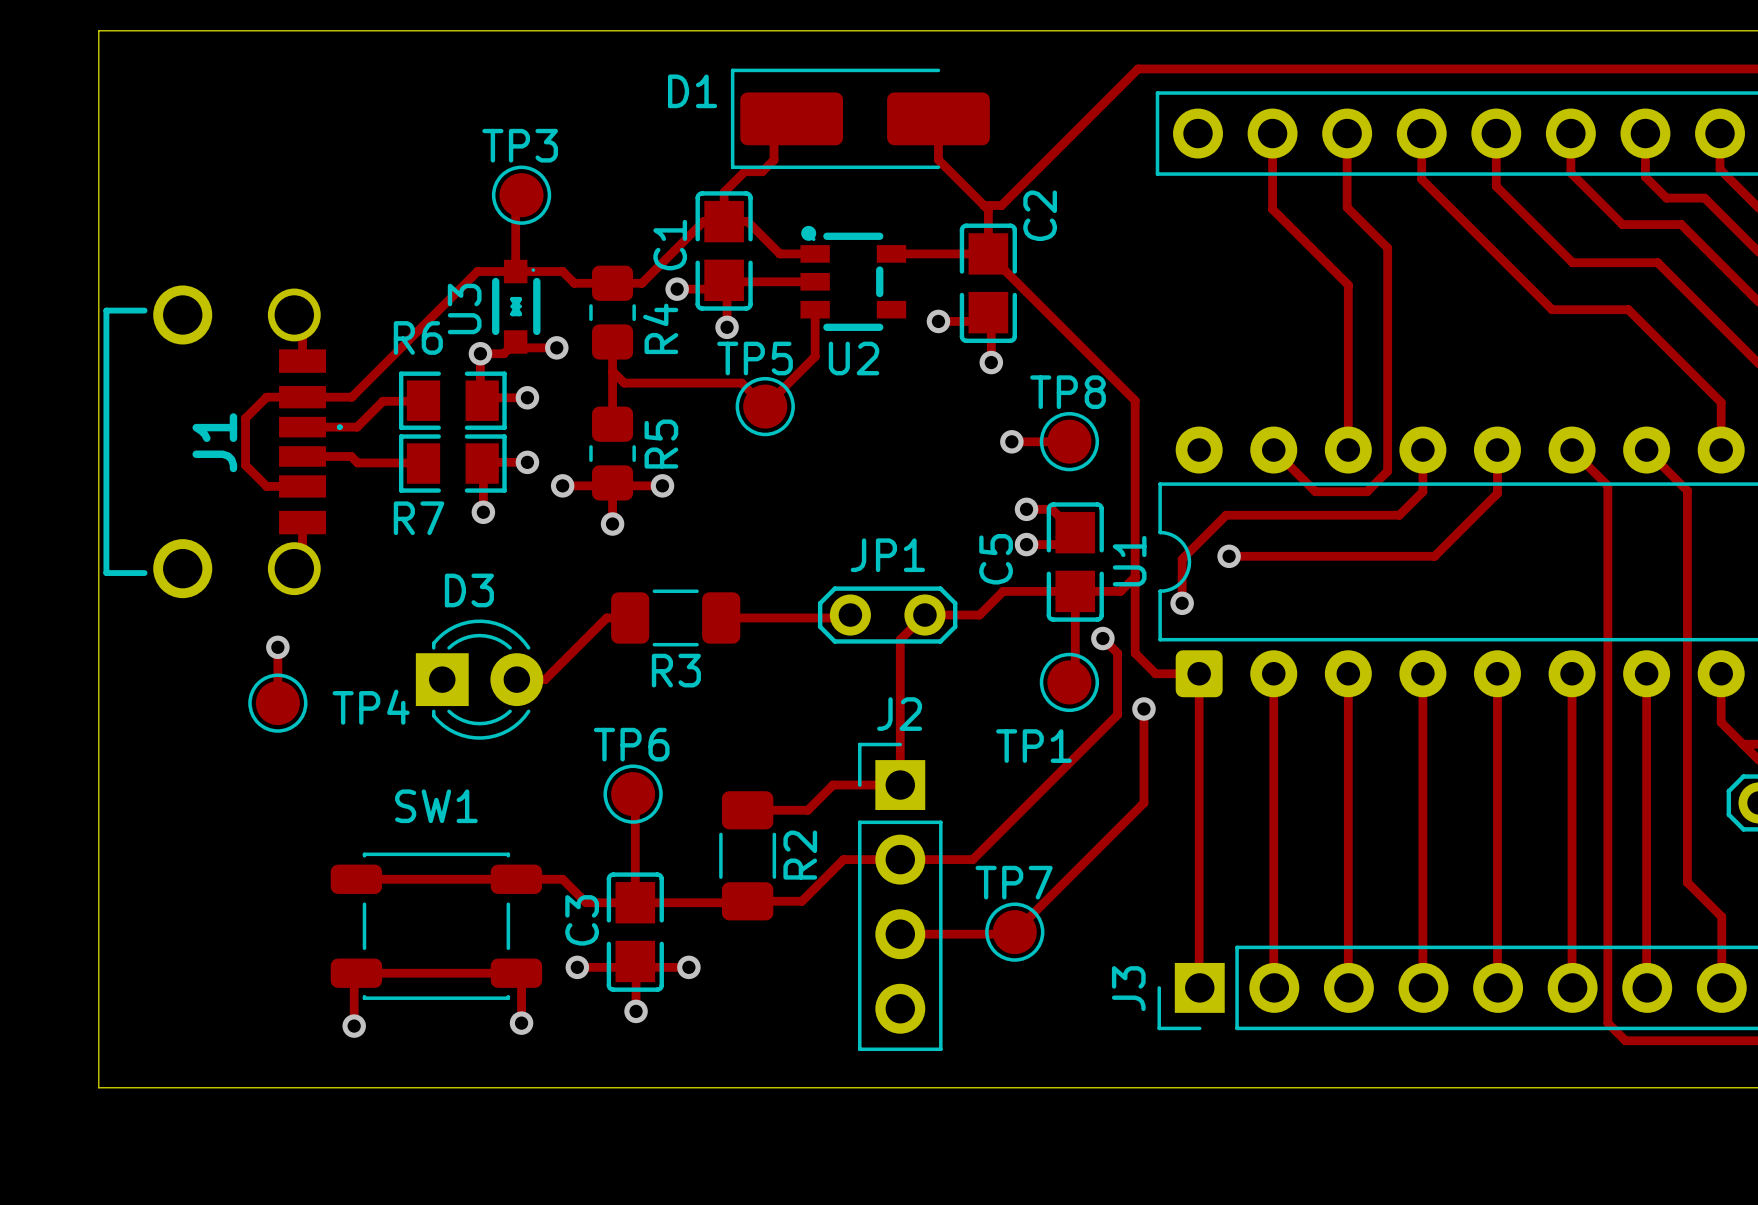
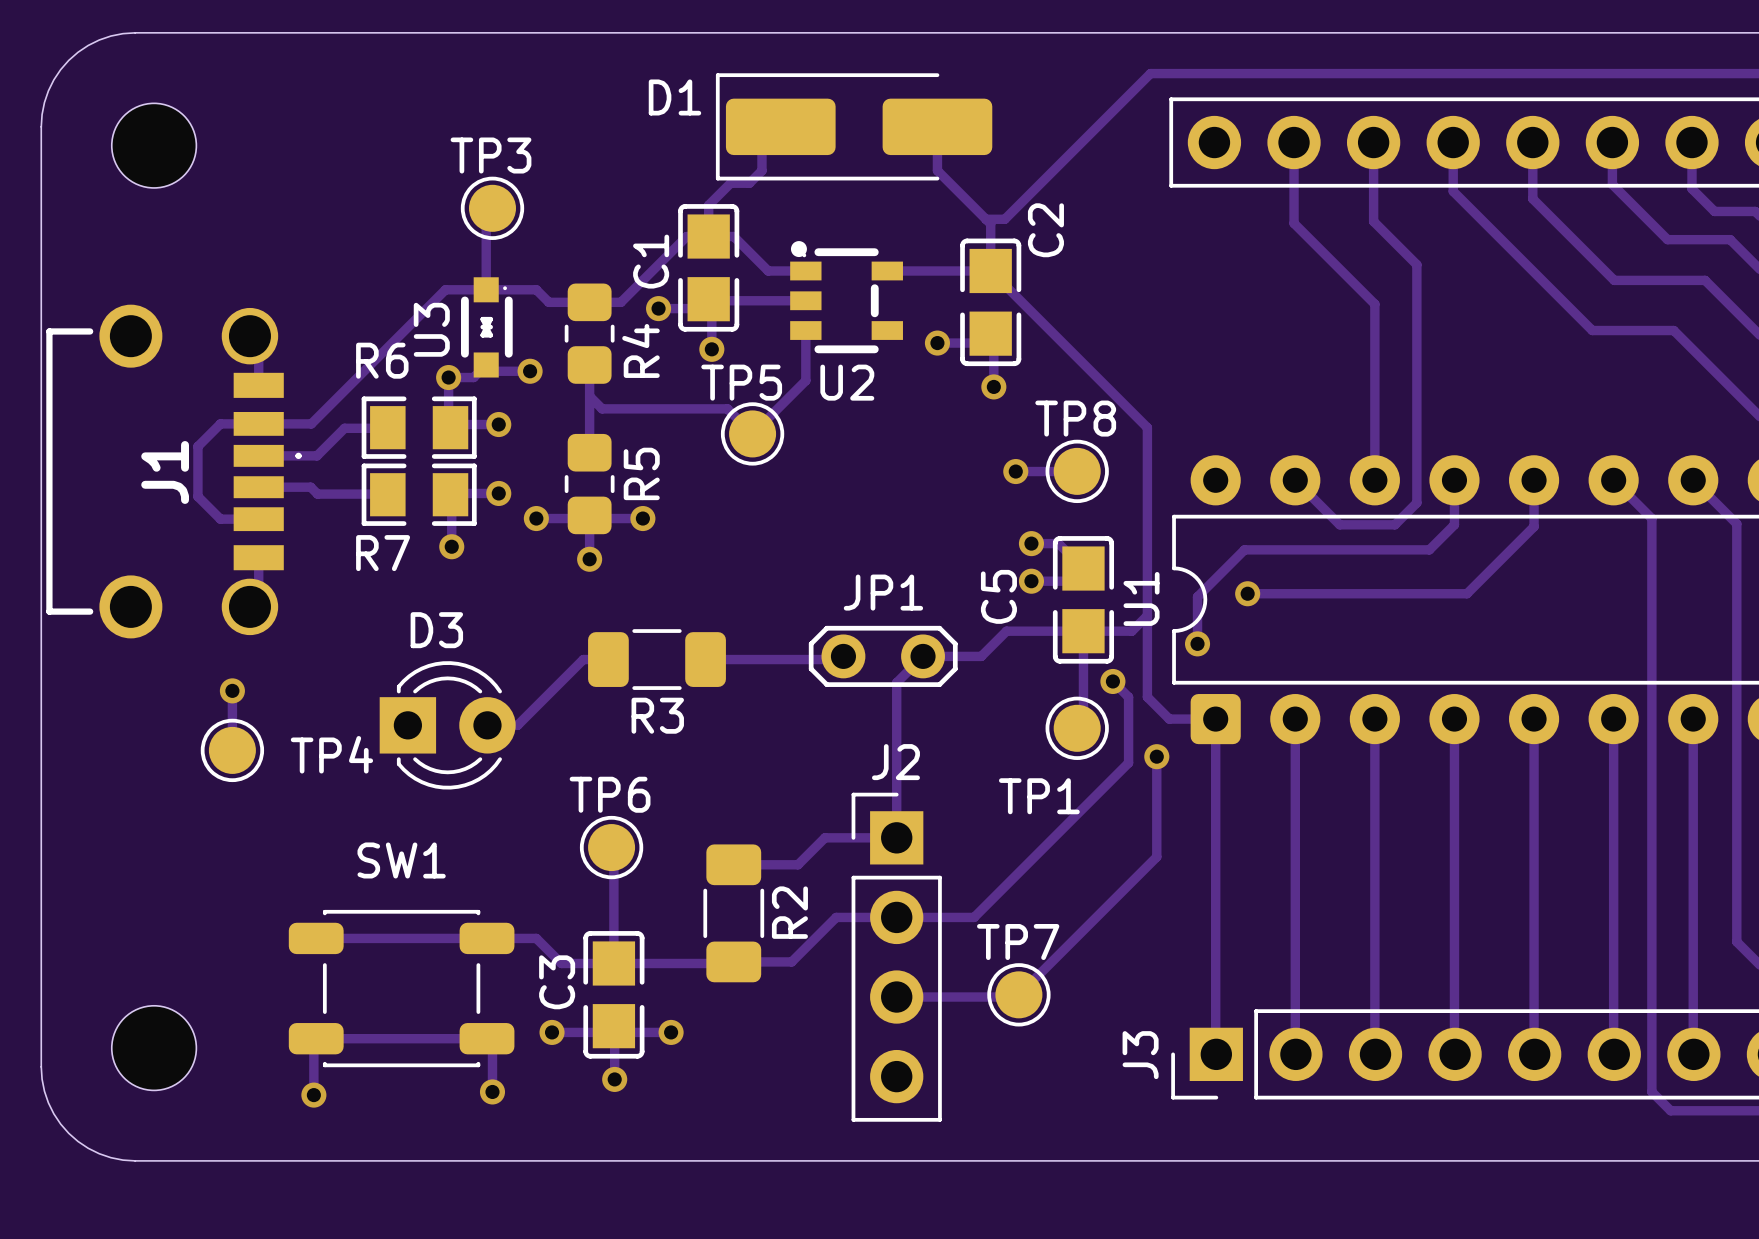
board edge: (186, 30) (98, 30) (98, 118) -> (135, 32) (110, 36) (99, 40) (78, 52) (68, 60) (60, 69) (48, 90) (44, 102) (41, 126)
part: none -> (154, 145)
part: none -> (154, 1048)
board edge: (98, 999) (98, 1087) (186, 1087) -> (41, 1066) (44, 1091) (48, 1102) (60, 1124) (68, 1133) (88, 1148) (99, 1153) (123, 1160) (135, 1160)

